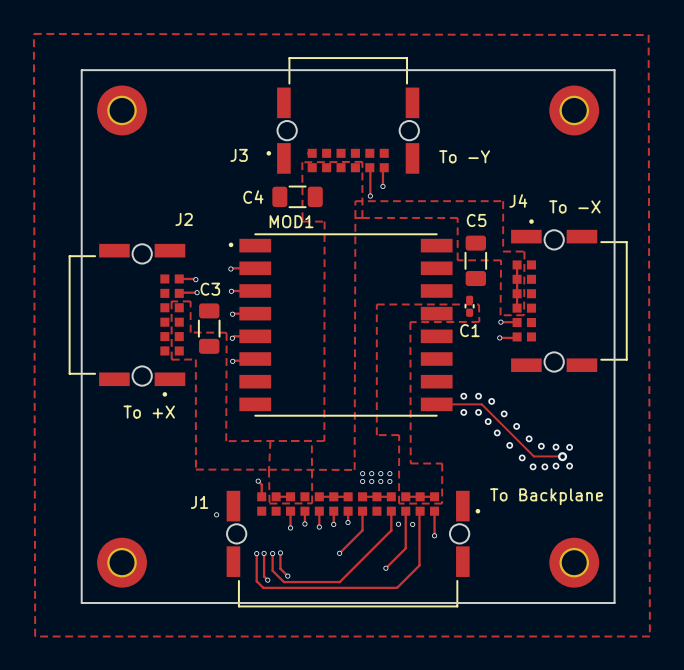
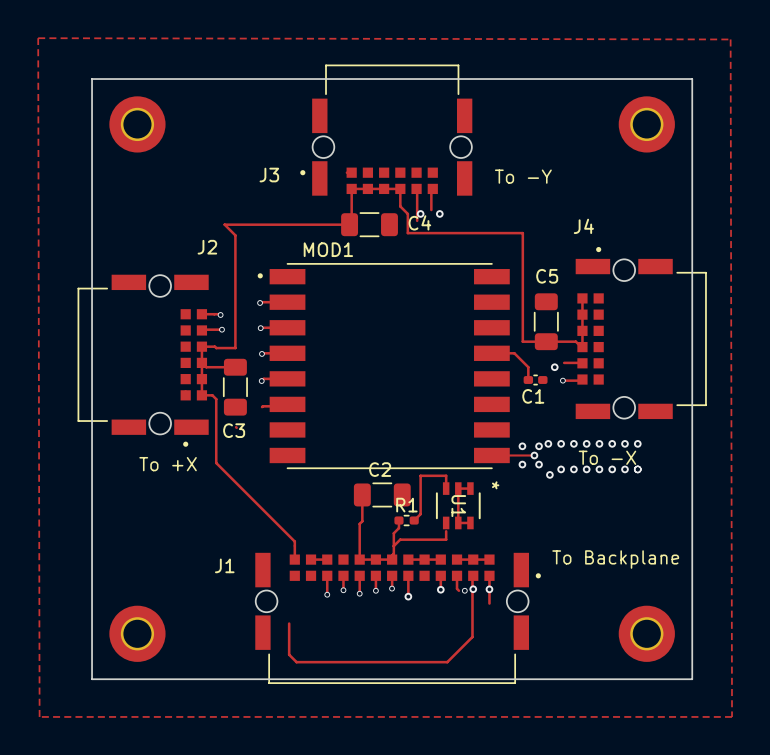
via: (382, 186) -> none
via: none -> (420, 213)
via: none -> (439, 213)
C4 position: (297, 196) -> (369, 224)
via: (370, 196) -> none
C4 name position: C4 (253, 197) -> C4 (419, 222)
text position: To -X (574, 206) -> To -X (607, 457)
zone outline: (355, 217) (457, 217) (457, 260) (501, 260) (500, 315) (524, 315) (524, 251) (503, 251) (503, 201) (355, 201) (355, 217) -> none
zone outline: (355, 217) (354, 469) (268, 469) -> none
zone outline: (355, 217) (362, 217) (362, 161) (302, 162) (302, 221) (324, 221) (324, 441) (270, 441) (268, 469) -> none
C5 position: (475, 260) -> (546, 321)
C3 name position: C3 (210, 289) -> C3 (234, 430)
zone outline: (376, 304) (376, 435) (399, 435) (399, 503) (442, 503) (442, 463) (410, 463) (410, 322) (479, 321) (478, 304) (376, 304) -> none
C1 rotation: 0° (469, 306) -> 90° clockwise (535, 380)
C1 position: (469, 306) -> (535, 380)
track: none -> (491, 353) (514, 353) (528, 367) (528, 380)
track: none -> (201, 362) (206, 367) (235, 367)
via: (500, 322) -> none
via: none -> (554, 367)
C3 position: (209, 328) -> (235, 387)
via: (232, 361) -> none
track: none -> (236, 427) (236, 427)
via: none -> (548, 443)
via: none -> (561, 443)
via: none -> (573, 443)
via: none -> (586, 443)
via: none -> (599, 443)
via: none -> (612, 443)
via: none -> (624, 443)
via: none -> (637, 443)
via: (491, 401) -> none
track: (474, 404) (481, 404) (533, 456) (562, 456) -> none
via: none -> (534, 455)
via: (504, 413) -> none
via: none -> (561, 469)
via: none -> (573, 469)
via: none -> (586, 469)
via: none -> (599, 469)
via: none -> (612, 469)
via: none -> (624, 469)
via: none -> (637, 469)
via: (516, 426) -> none
via: (497, 432) -> none
track: none -> (446, 488) (446, 475) (420, 475) (420, 514) (414, 520)
track: none -> (470, 488) (458, 488) (458, 522) (470, 522)
via: (529, 438) -> none
track: none -> (362, 494) (359, 559)
C2: none -> (382, 494)
via: (509, 445) -> none
via: (541, 446) -> none
via: (555, 447) -> none
via: (569, 447) -> none
U1: none -> (458, 505)
via: (562, 456) -> none
via: (522, 457) -> none
track: none -> (398, 520) (398, 528) (393, 533) (392, 559)
R1: none -> (406, 520)
via: (533, 466) -> none
via: (544, 466) -> none
via: (555, 466) -> none
via: (569, 466) -> none
zone outline: (268, 469) (195, 469) (195, 359) (171, 359) (171, 301) (190, 301) (190, 332) (226, 332) (226, 441) (311, 440) (312, 503) (269, 503) (268, 469) -> none
track: none -> (446, 531) (446, 539) (400, 539) (393, 546)
via: (362, 473) -> none
via: (371, 473) -> none
via: (380, 473) -> none
via: (389, 473) -> none
track: (258, 481) (261, 484) -> (582, 347) (575, 341) (522, 341) (522, 233) (407, 233) (407, 213) (400, 206) (400, 188) (351, 188) (351, 222) (349, 224) (224, 224) (235, 235) (235, 348) (201, 346) (201, 395) (212, 395) (216, 399) (216, 463) (294, 541) (294, 545)
via: (258, 481) -> none
via: (362, 481) -> none
via: (371, 481) -> none
via: (380, 481) -> none
via: (389, 481) -> none
via: (216, 514) -> none
track: (405, 522) (405, 548) (385, 568) -> (457, 588) (458, 590)
track: (391, 523) (391, 530) (339, 582) (283, 582) (272, 570) (272, 553) -> none
via: none -> (440, 589)
via: none -> (473, 589)
via: none -> (489, 589)
via: (398, 524) -> none
track: (362, 529) (339, 553) -> none
via: none -> (408, 596)
via: (434, 535) -> none
track: (280, 552) (280, 568) (287, 576) -> none
via: (280, 552) -> none
via: (256, 553) -> none
track: (264, 553) (264, 576) (267, 580) -> none
via: (264, 553) -> none
via: (272, 553) -> none
via: (339, 553) -> none
via: (385, 568) -> none
via: (287, 576) -> none
via: (267, 580) -> none

